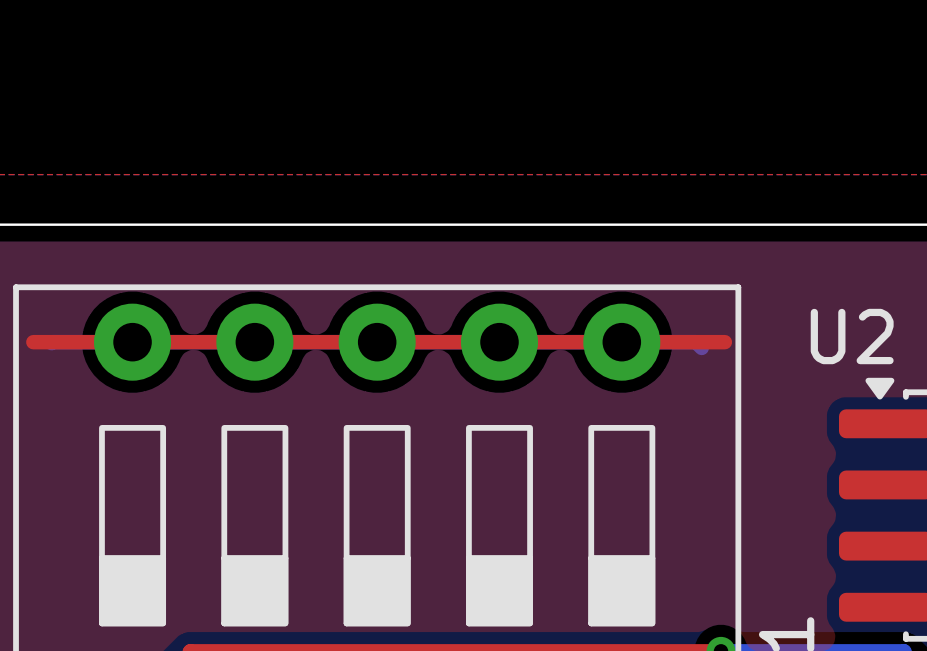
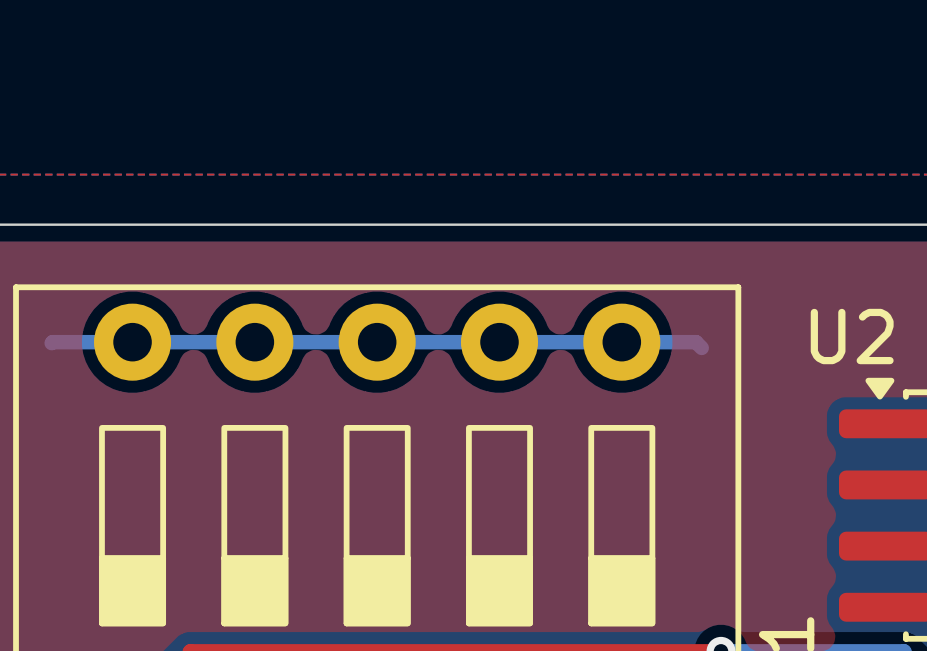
top track: (33, 342) (724, 342) -> none

